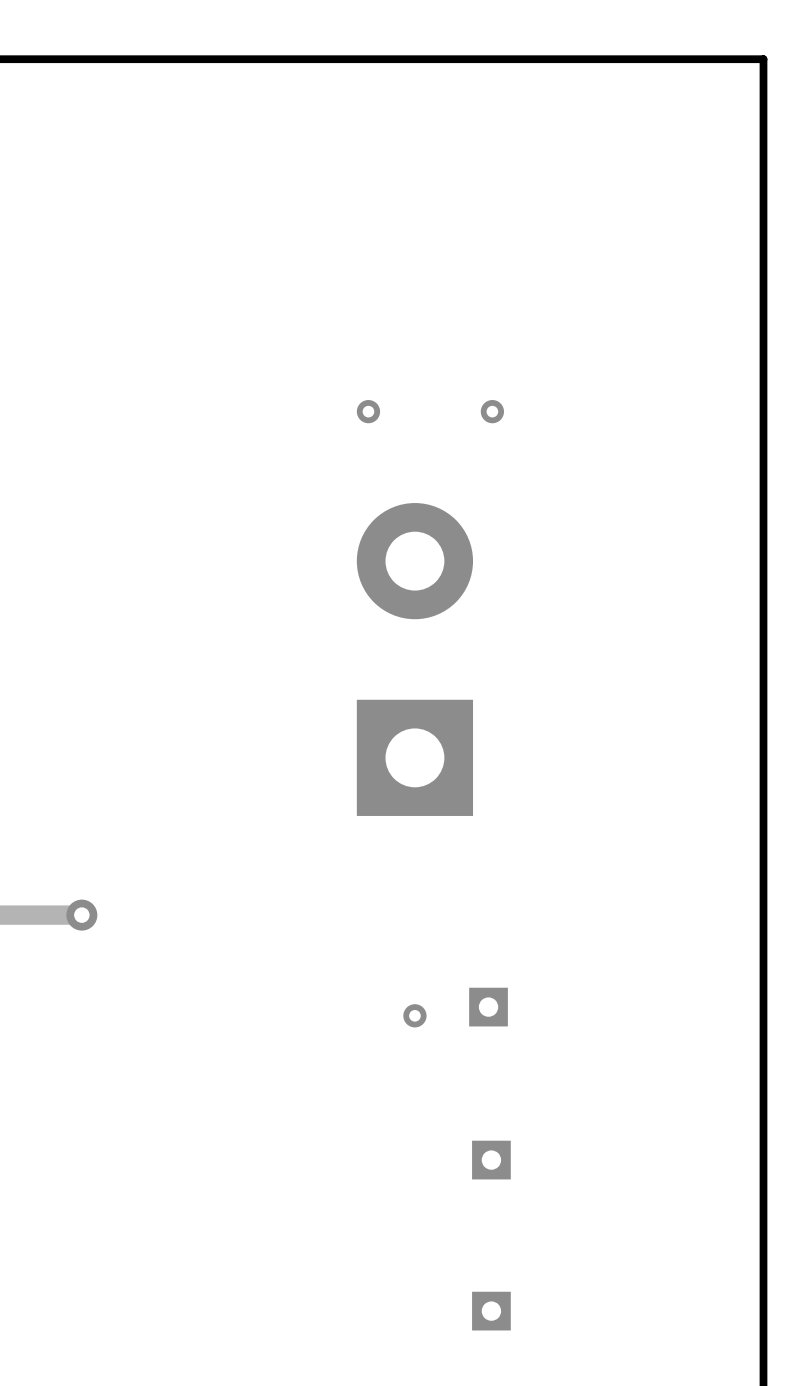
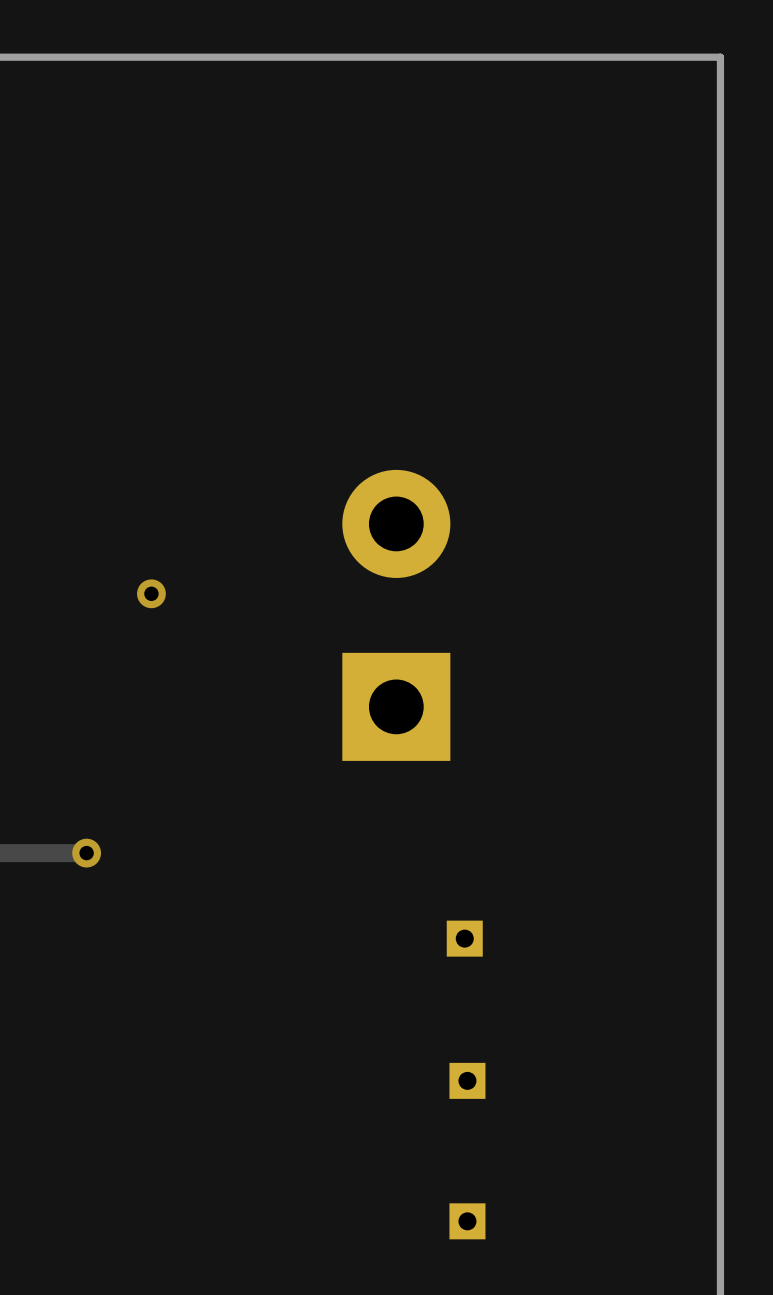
via: (368, 411) -> none
via: (492, 411) -> none
via: none -> (151, 593)
via: (414, 1015) -> none

